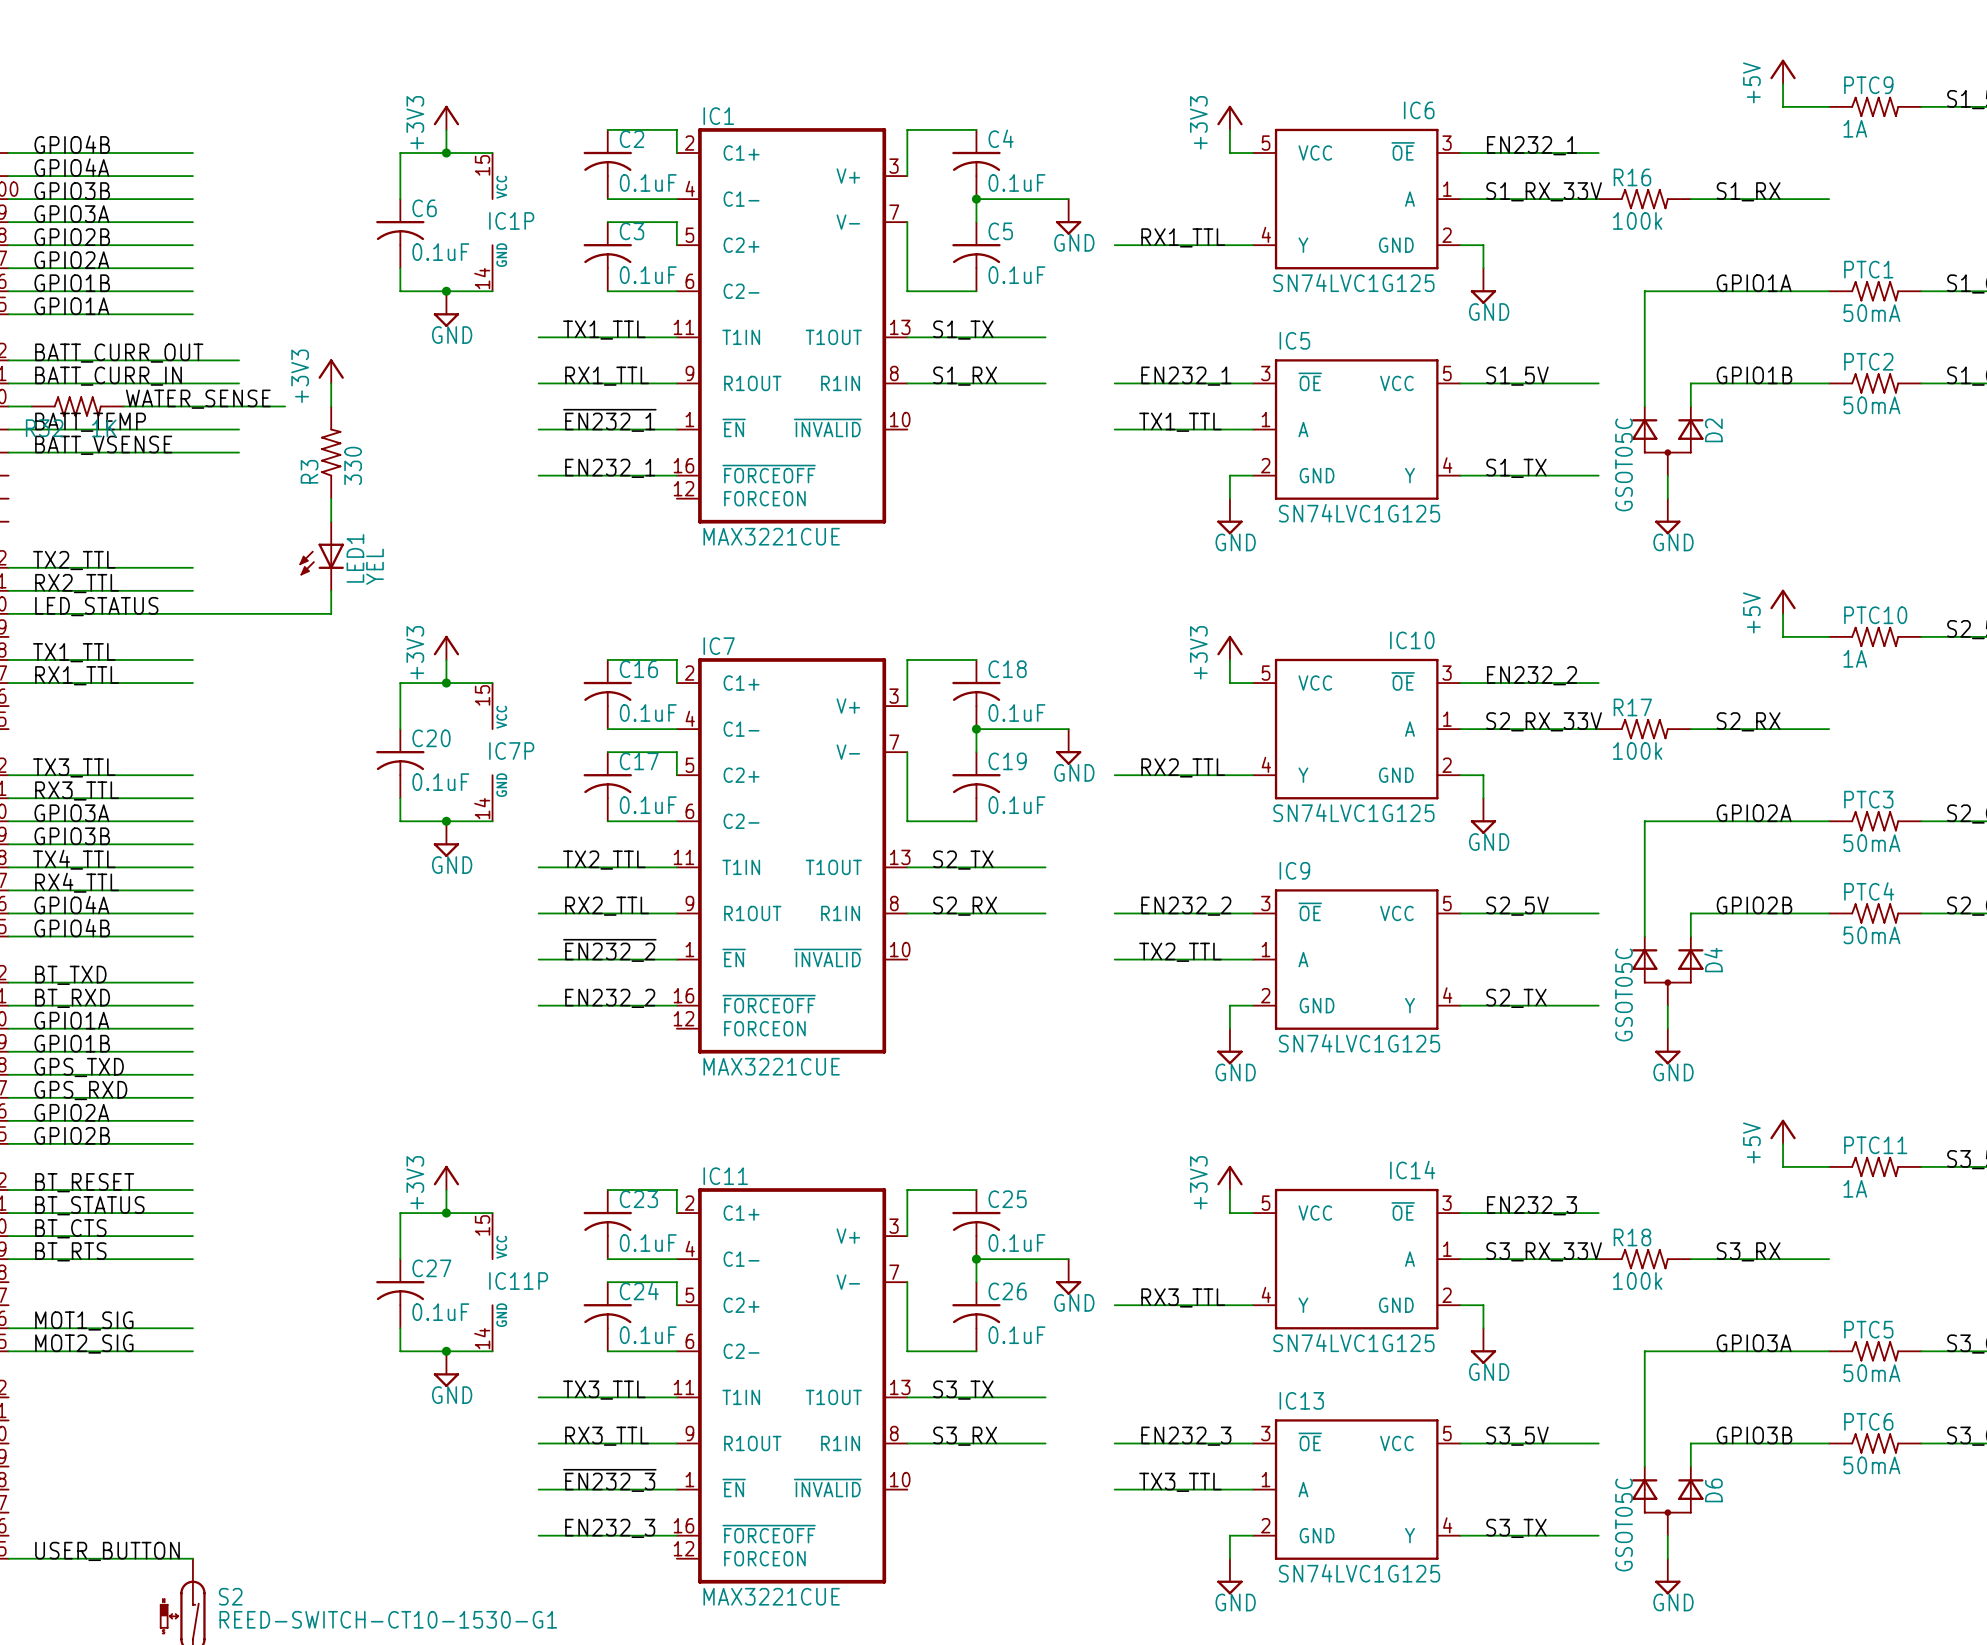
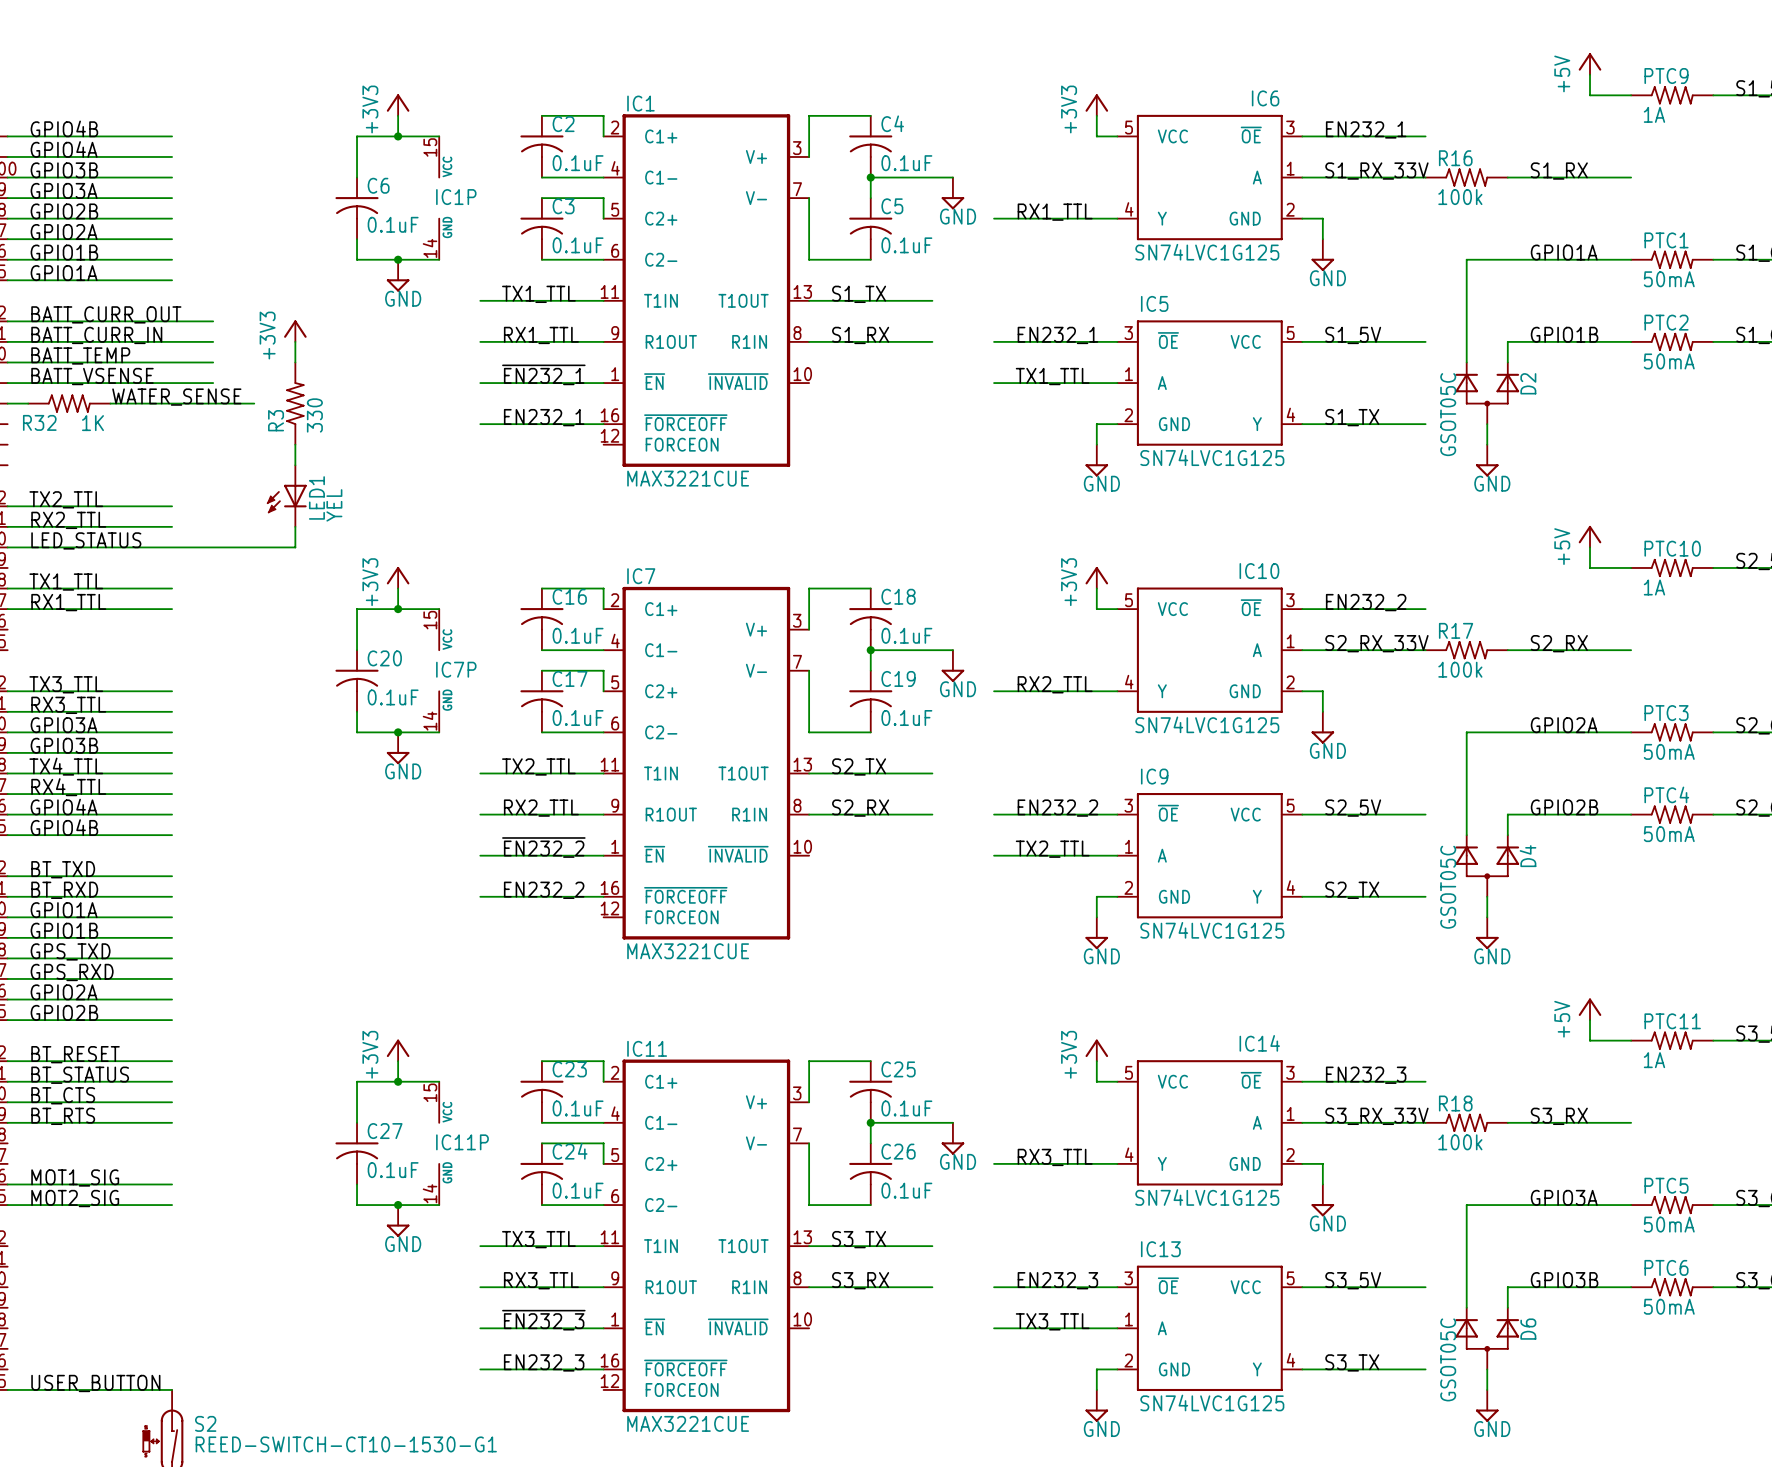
label: none -> BATT_TEMP (80, 355)
label position: WATER_SENSE (198, 399) -> WATER_SENSE (176, 397)
R32 position: (77, 406) -> (69, 403)
wire: (239, 406) (285, 406) -> (213, 403) (254, 403)
label: BATT_TEMP (90, 422) -> BATT_VSENSE (92, 376)
label: BATT_VSENSE (103, 445) -> none

